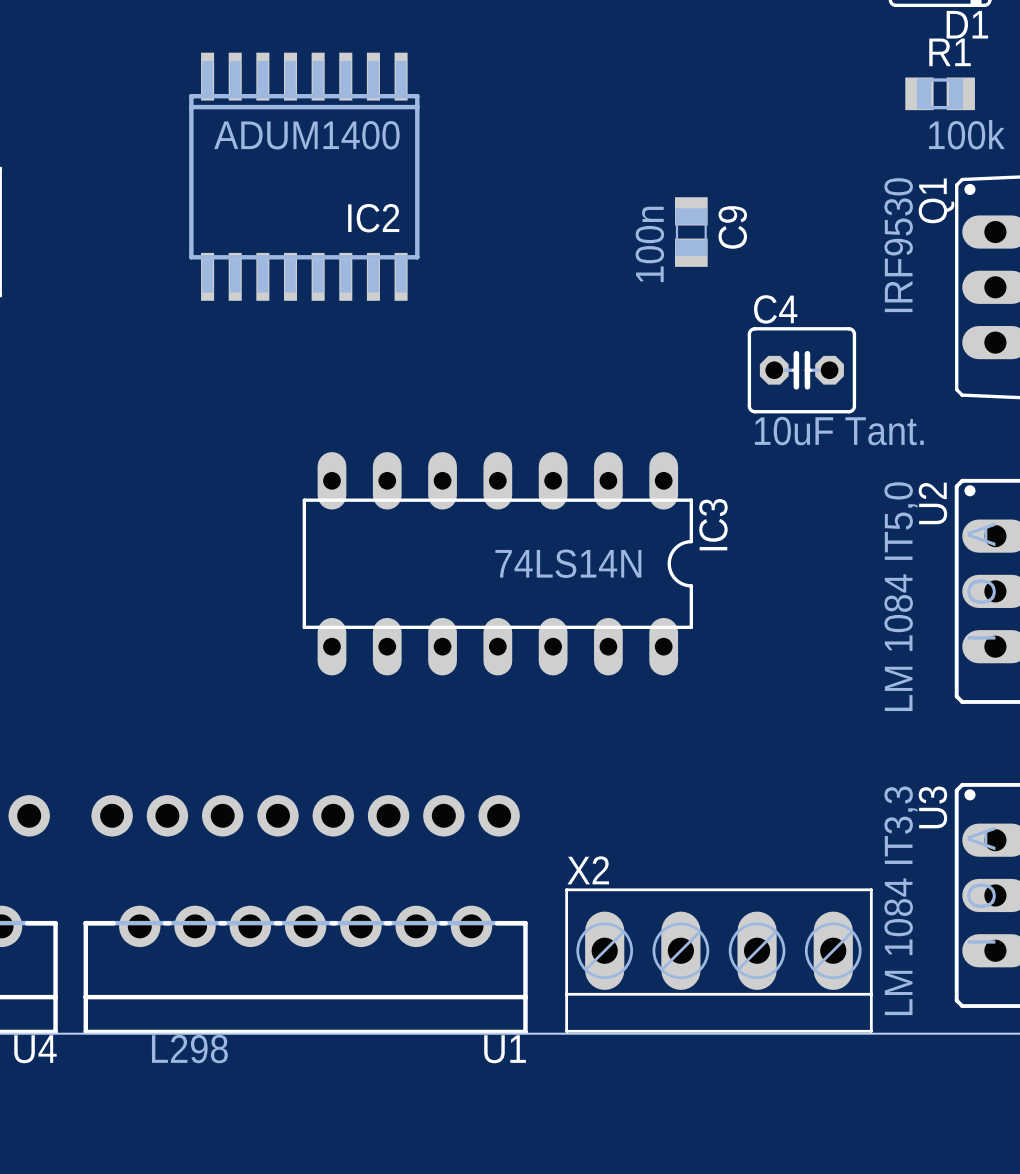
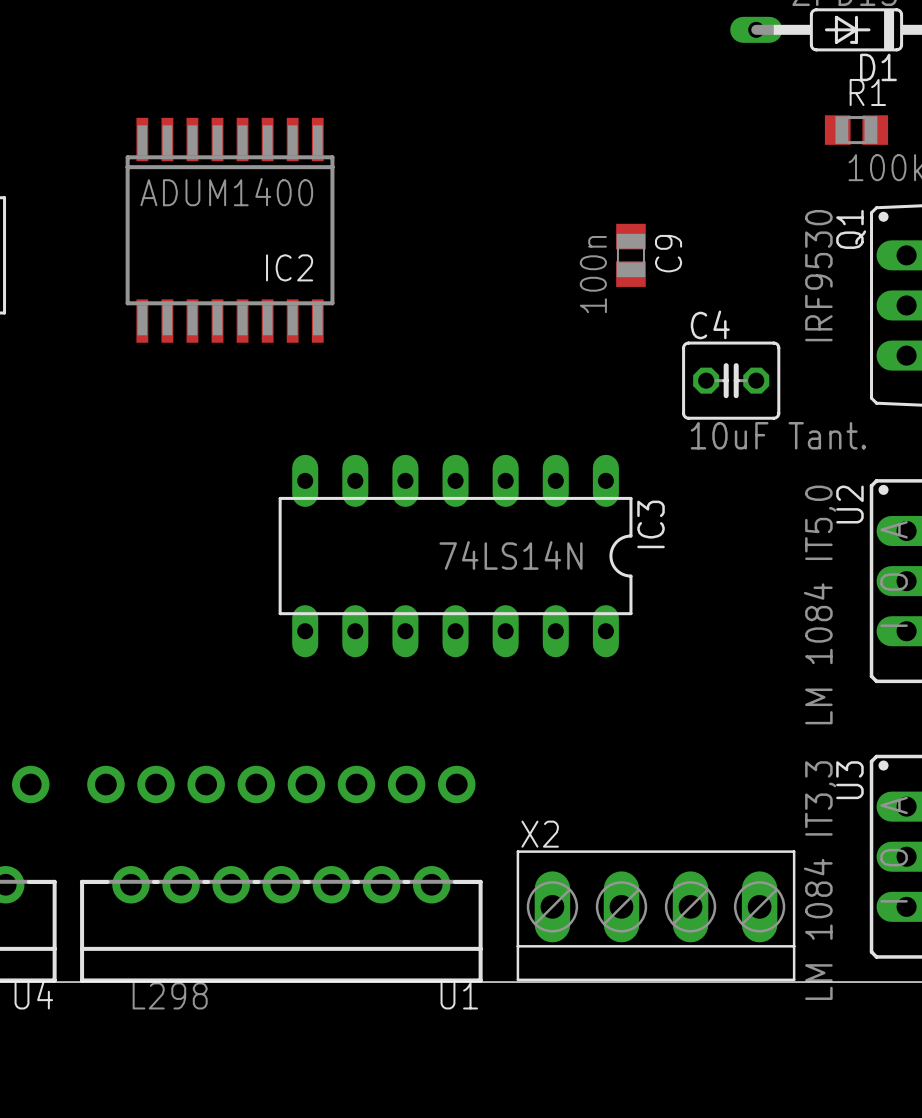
IC2 position: (304, 176) -> (230, 230)

